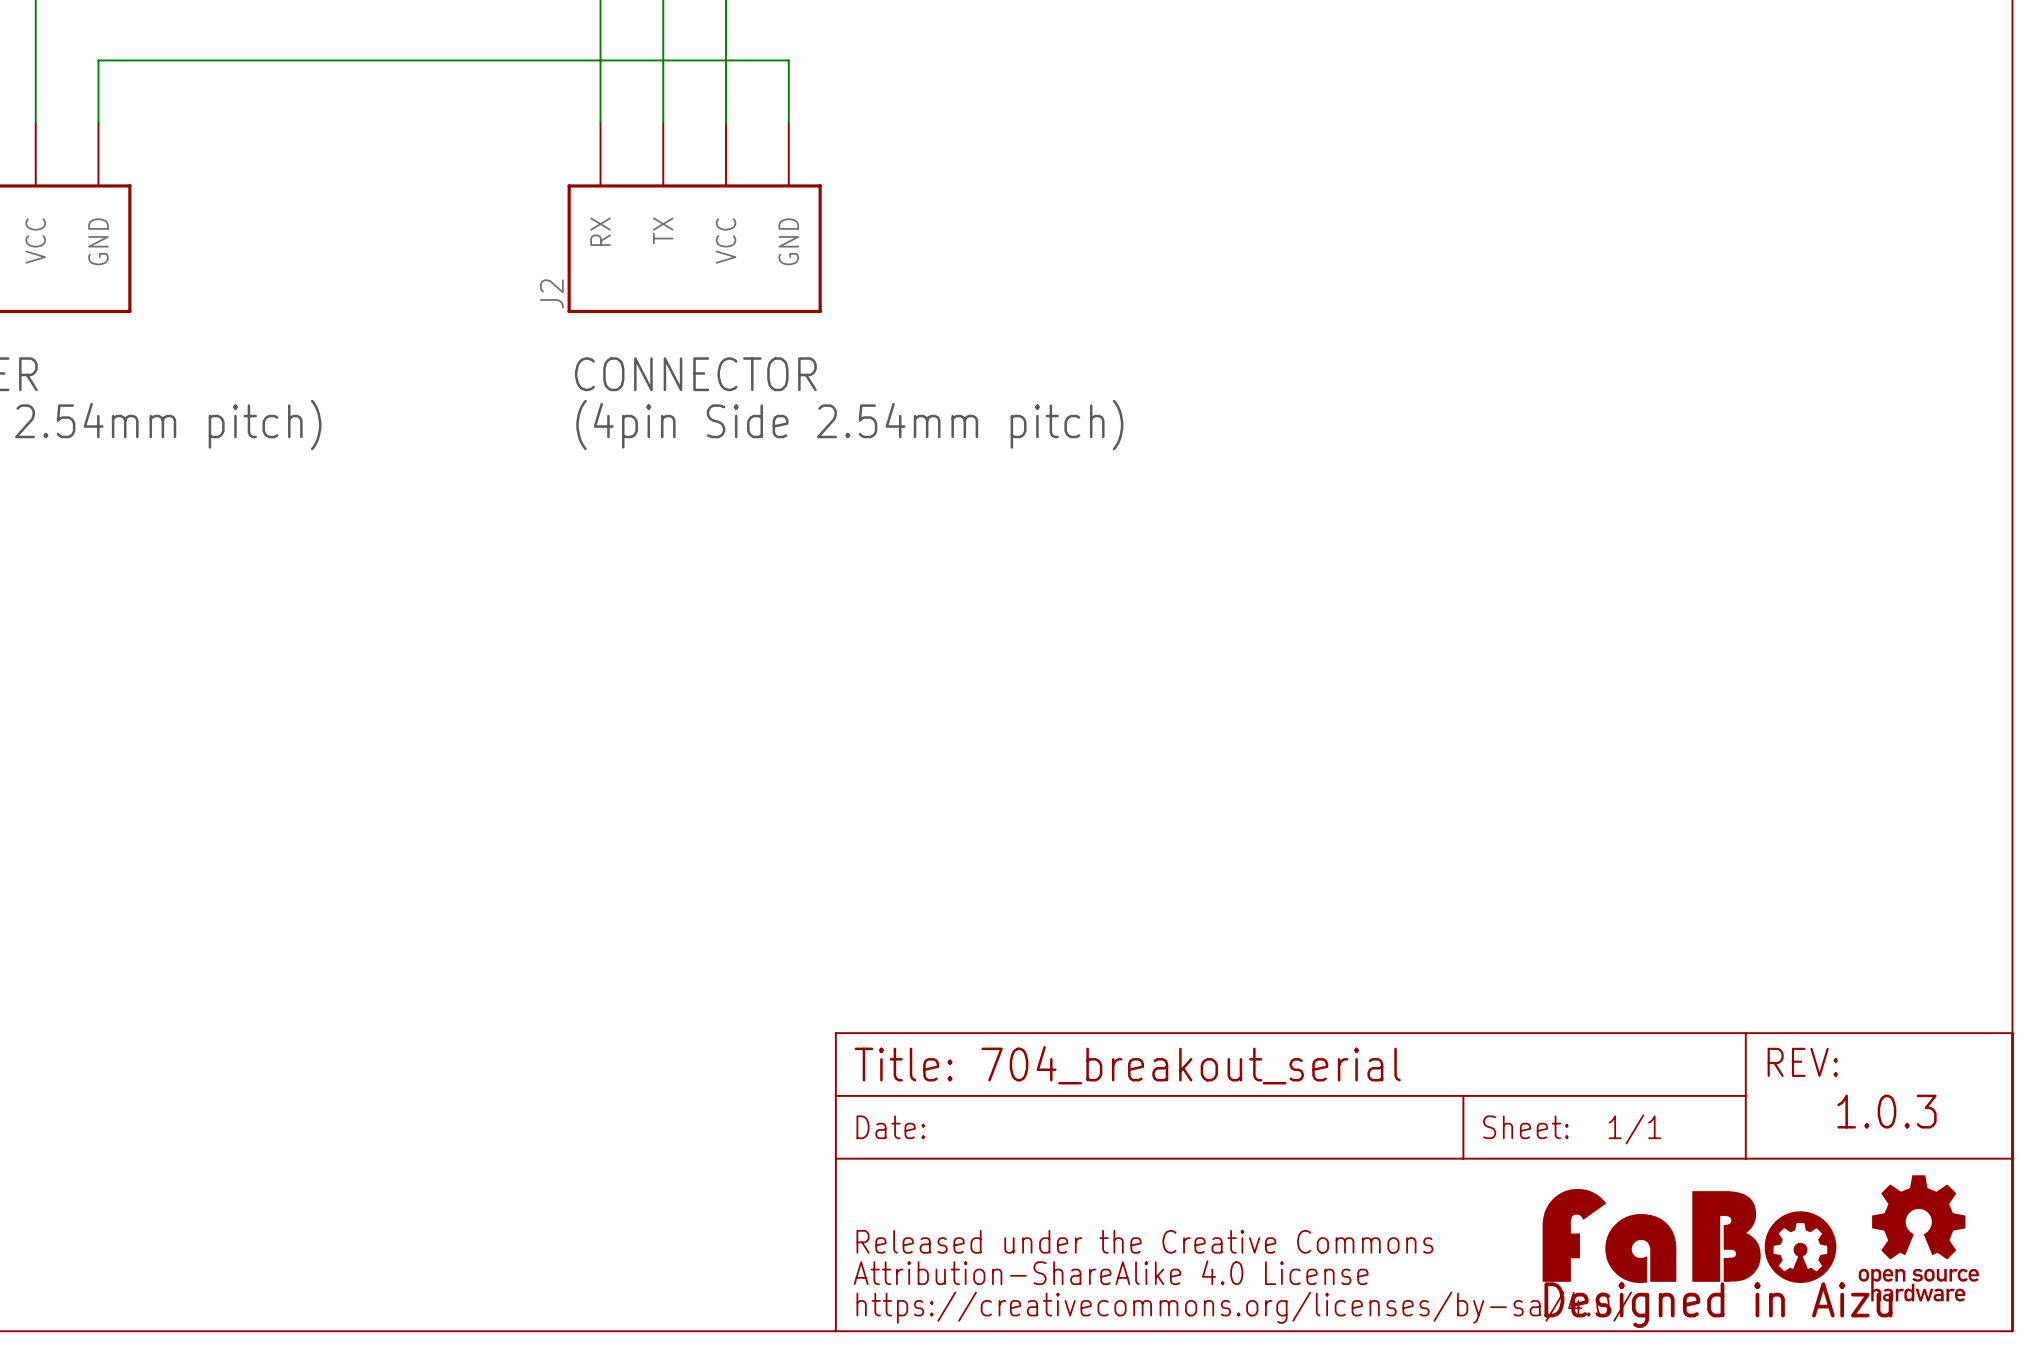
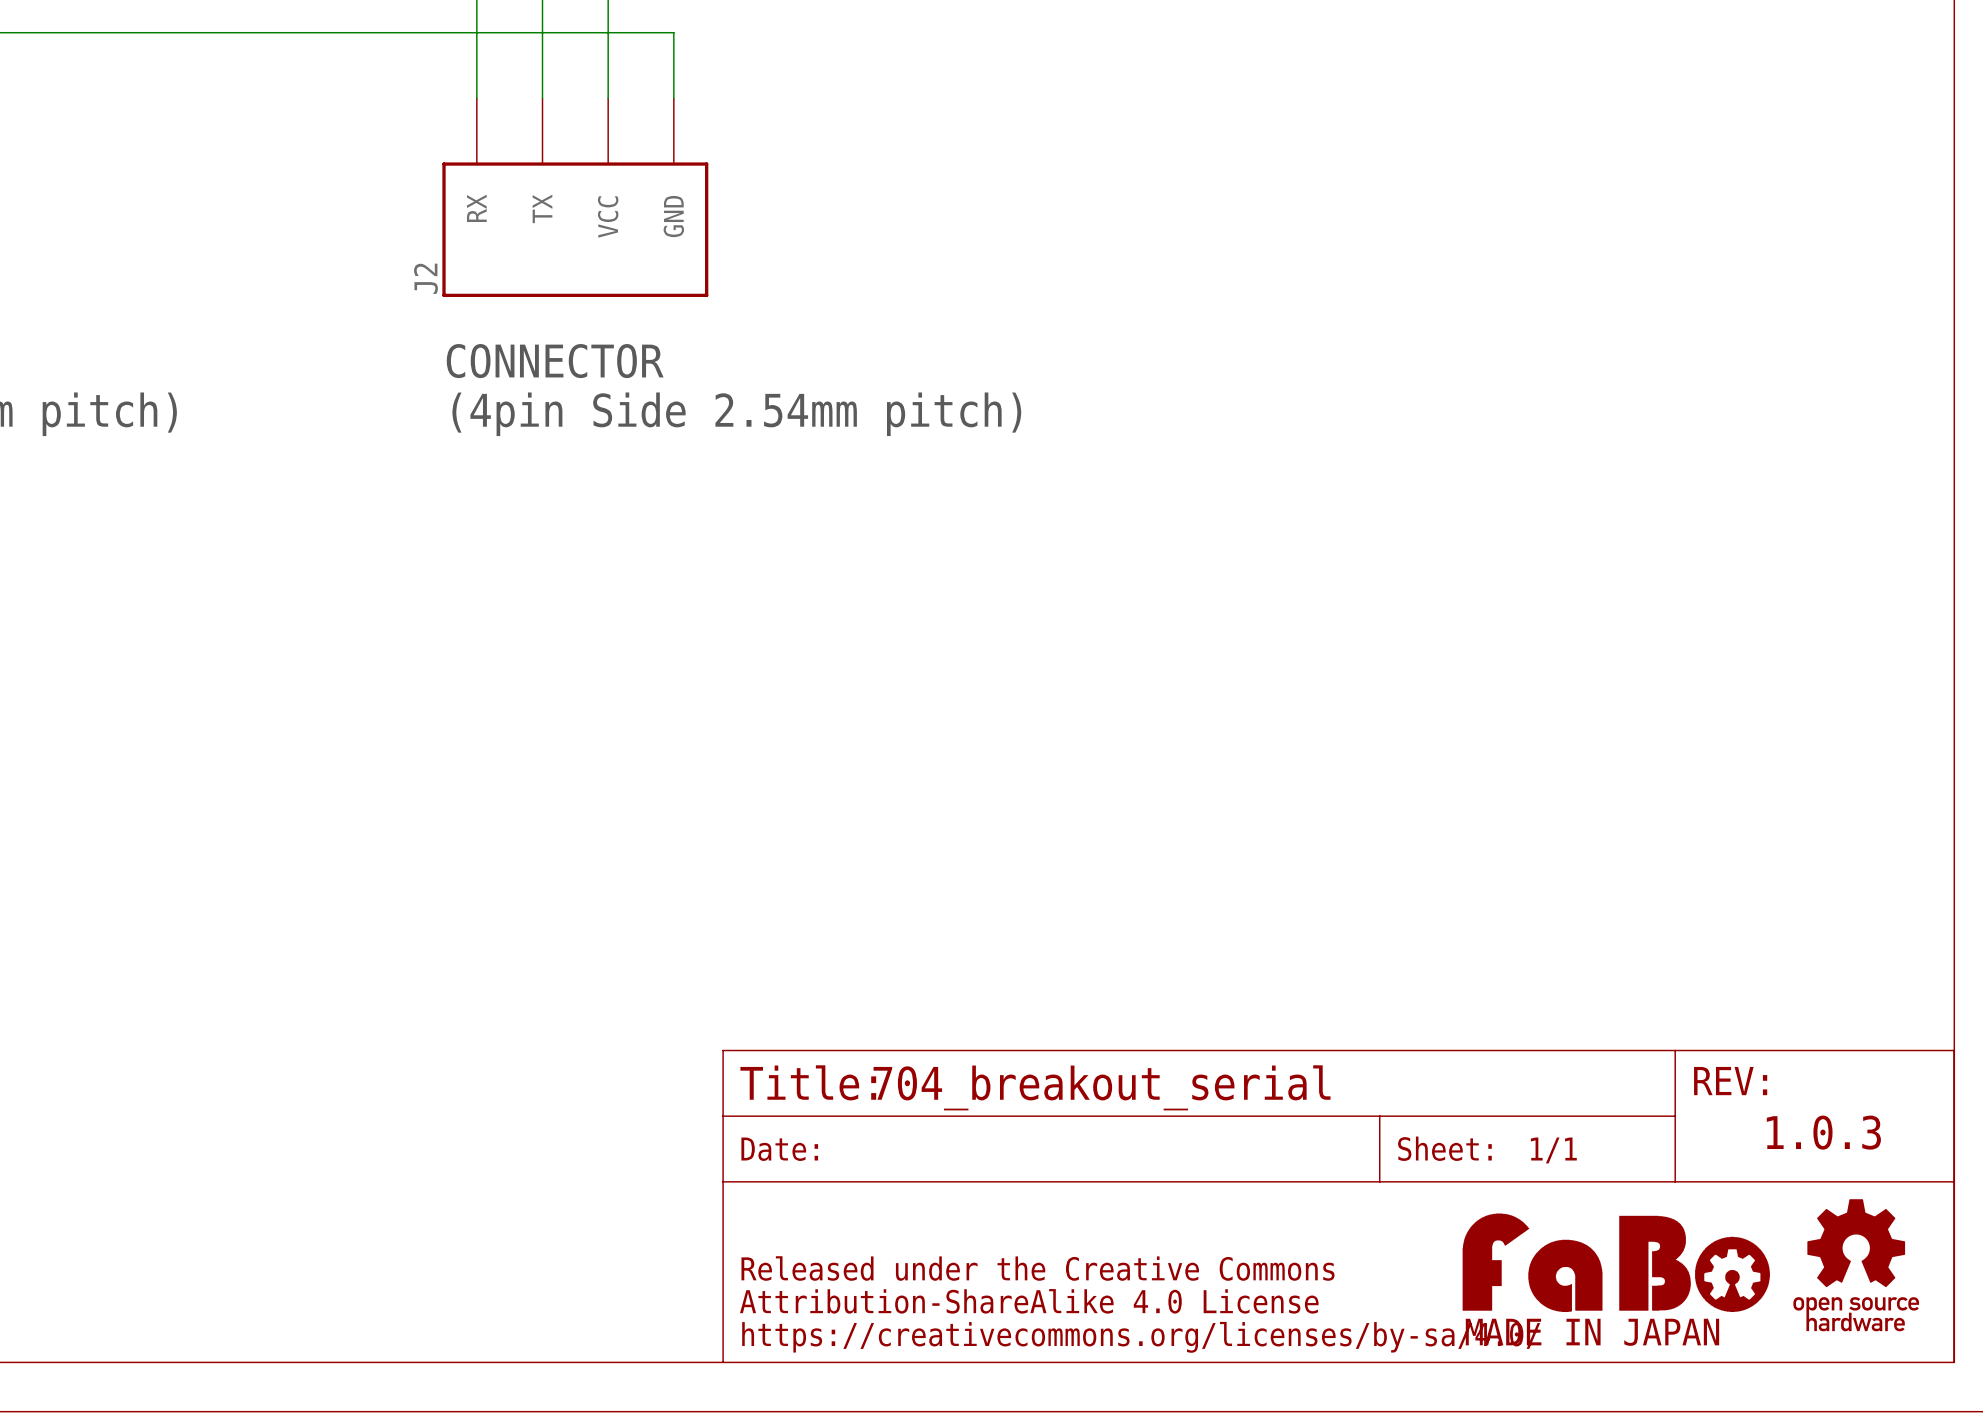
part text: none -> MADE IN JAPAN (1592, 1332)
part text: Designed in Aizu (1718, 1305) -> none

